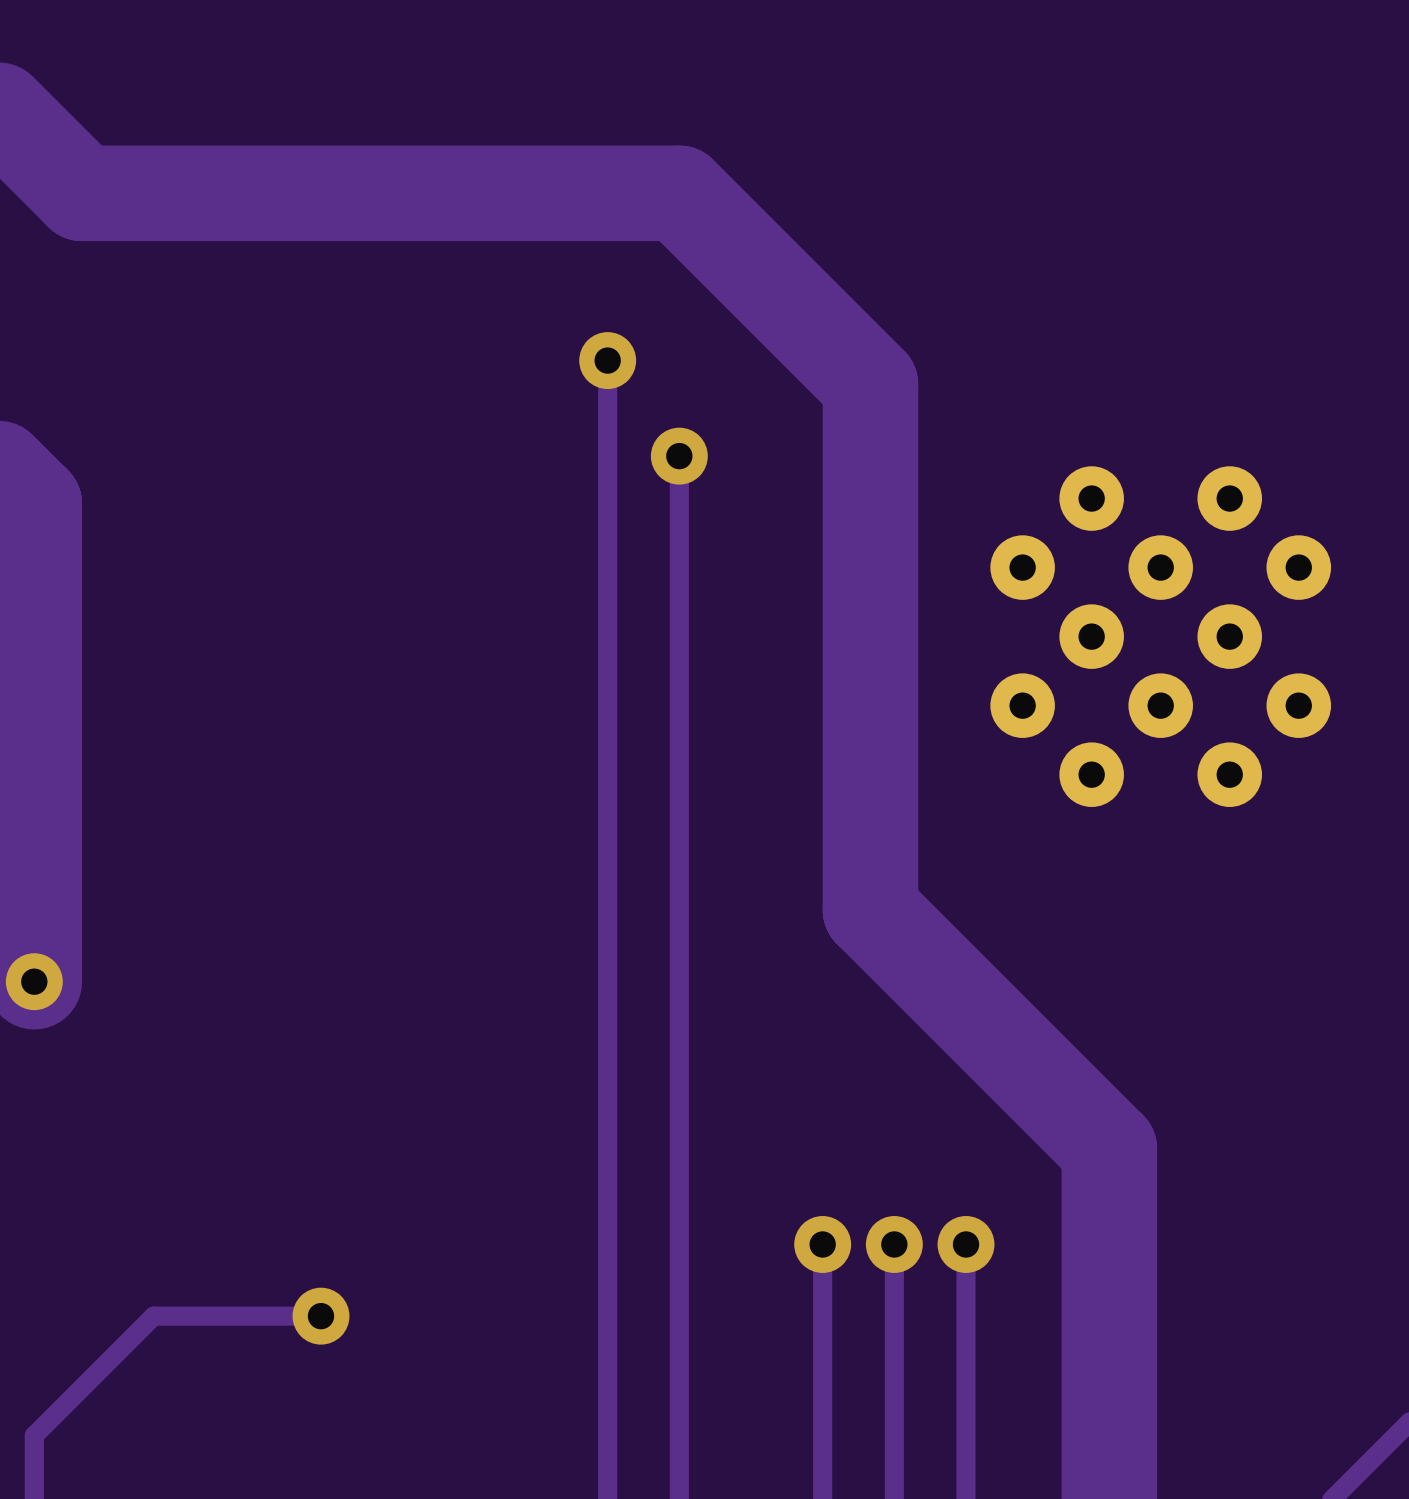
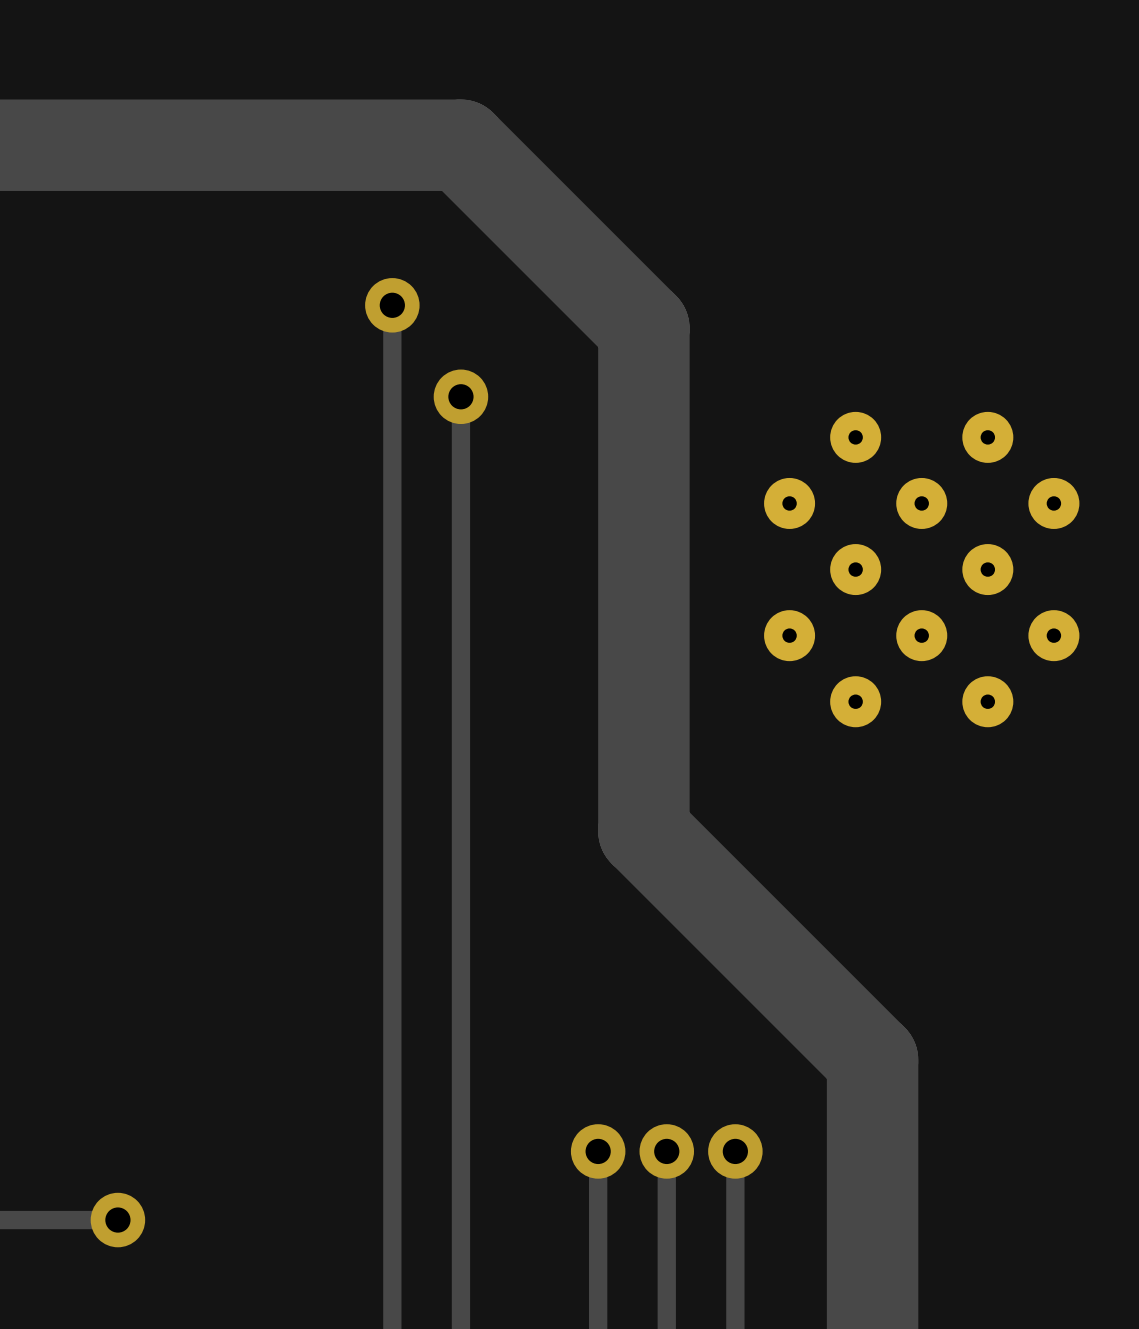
part footprint: [990, 466, 1332, 807] -> [764, 411, 1080, 728]

